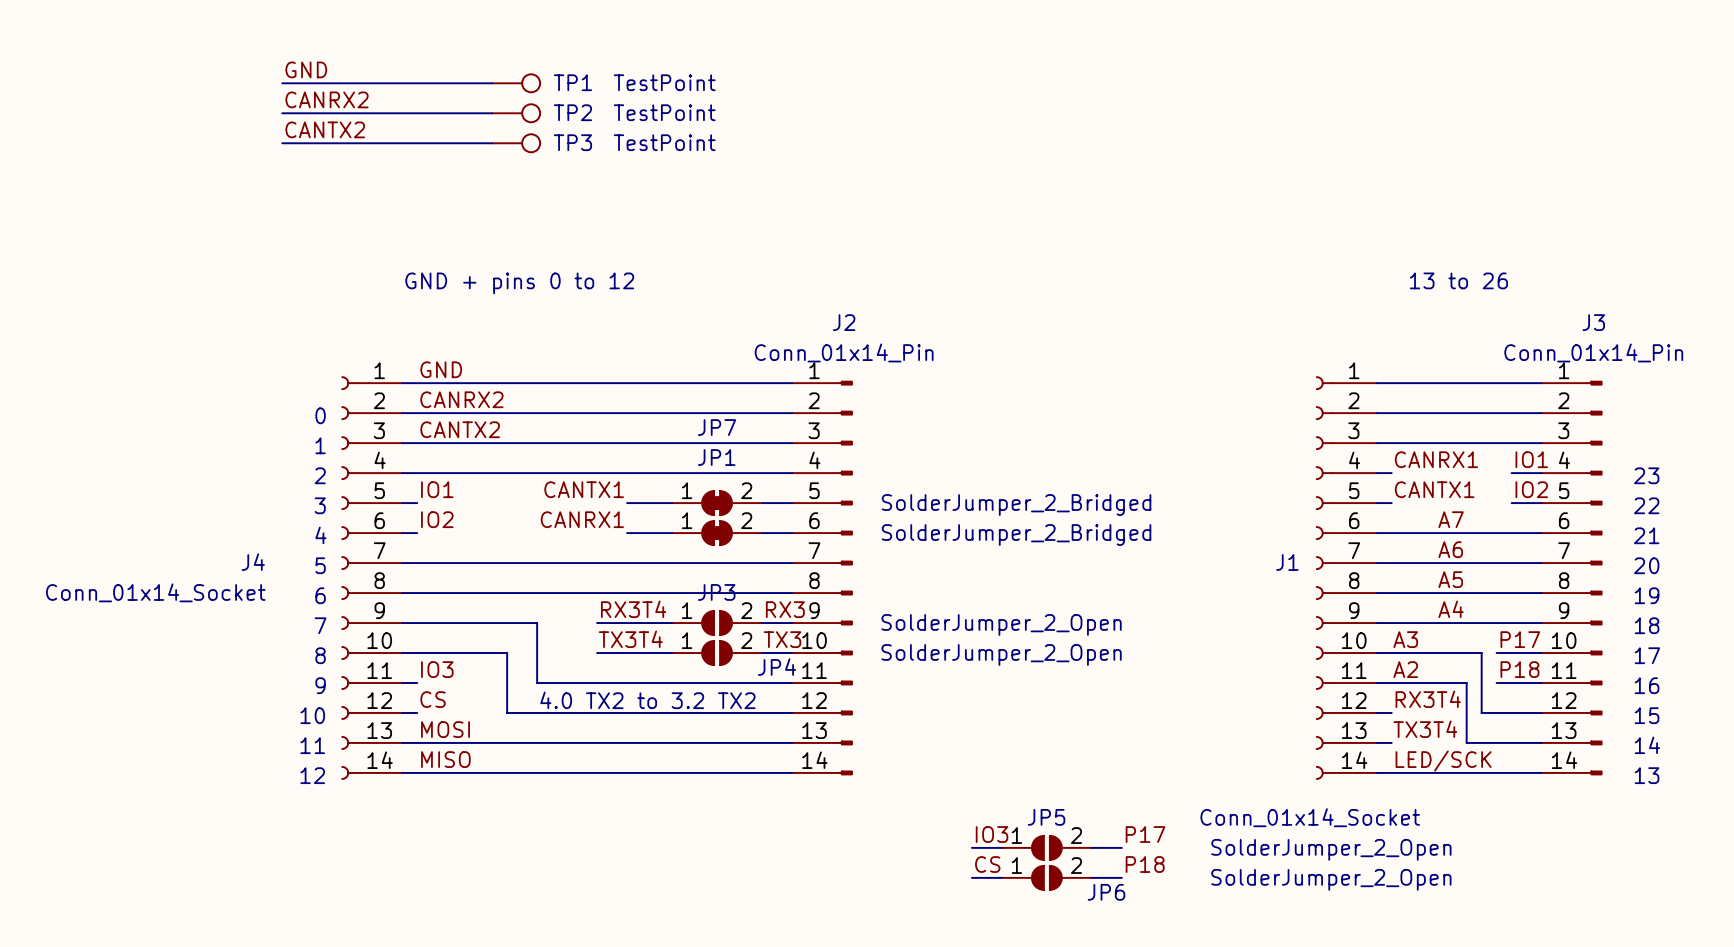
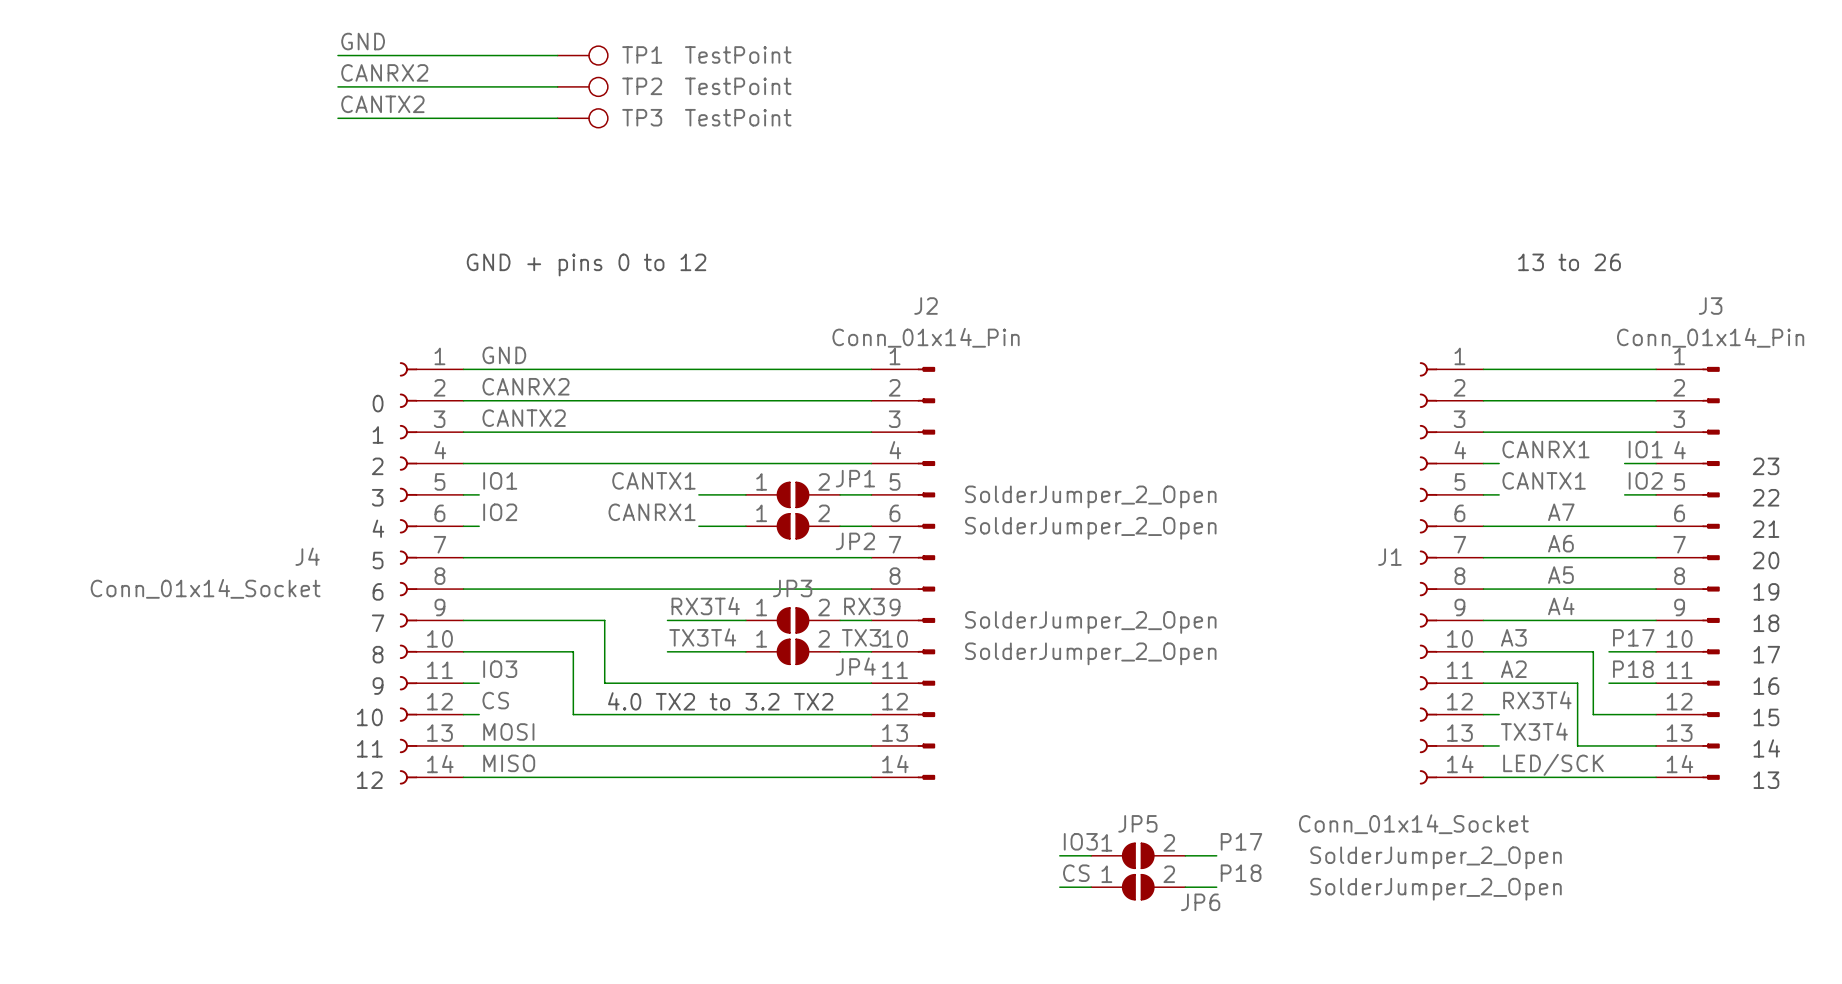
JP1 name position: JP1 (716, 457) -> JP1 (855, 478)
JP7: SolderJumper_2_Bridged (717, 503) -> none
JP1 symbol: [672, 521, 763, 546] -> [745, 482, 841, 508]
JP2: none -> SolderJumper_2_Open (793, 526)
JP1 value: SolderJumper_2_Bridged (1016, 535) -> SolderJumper_2_Open (1090, 496)

